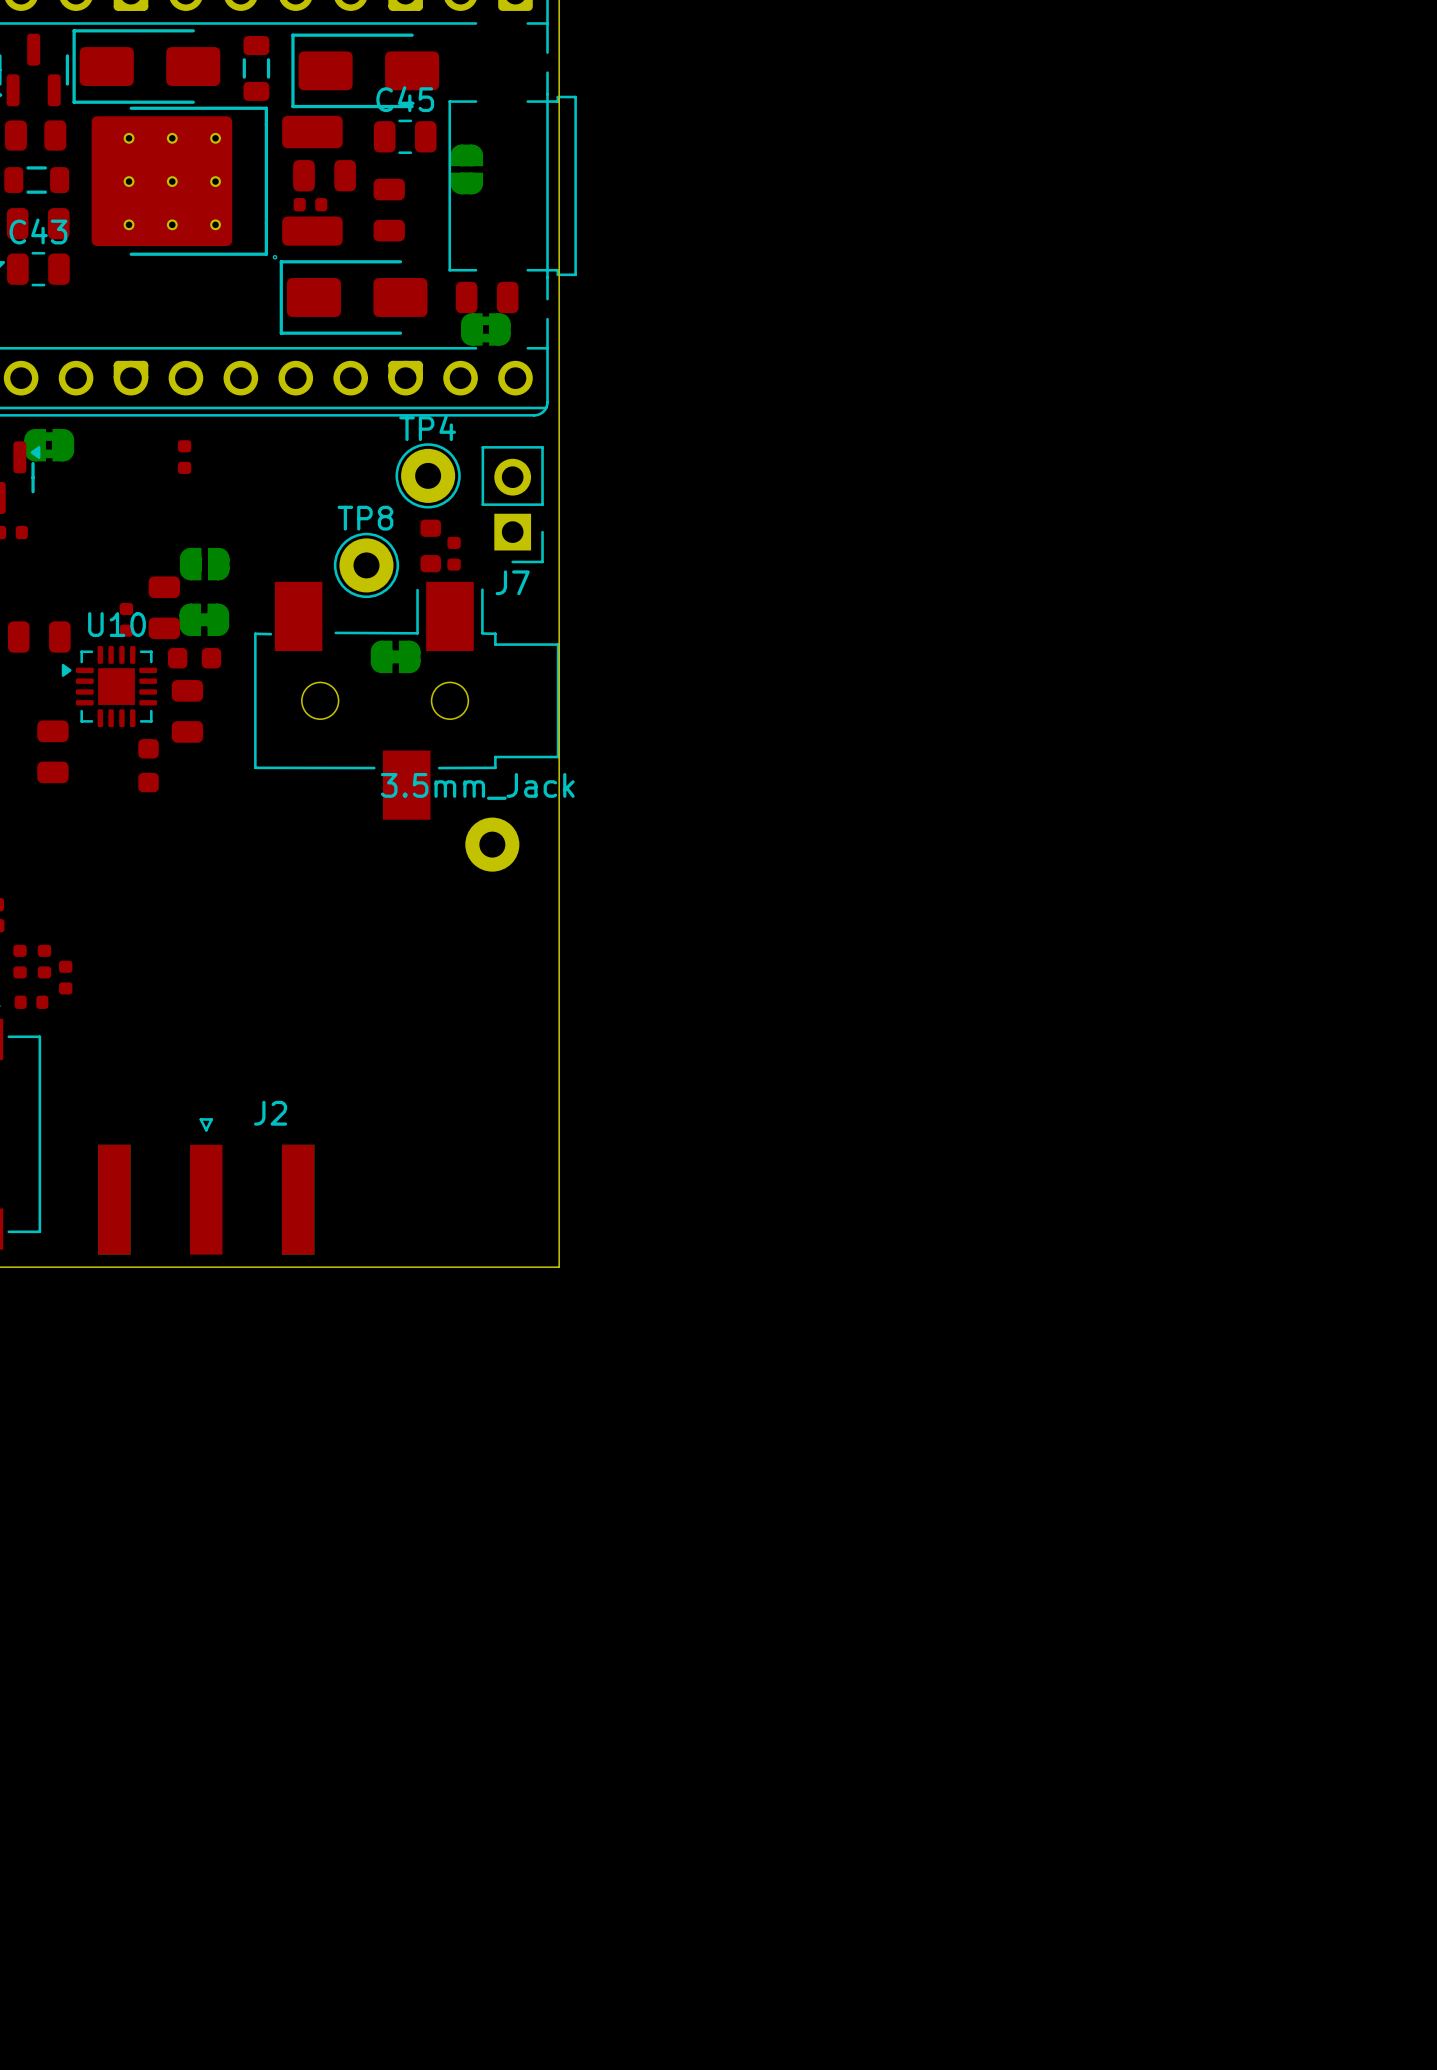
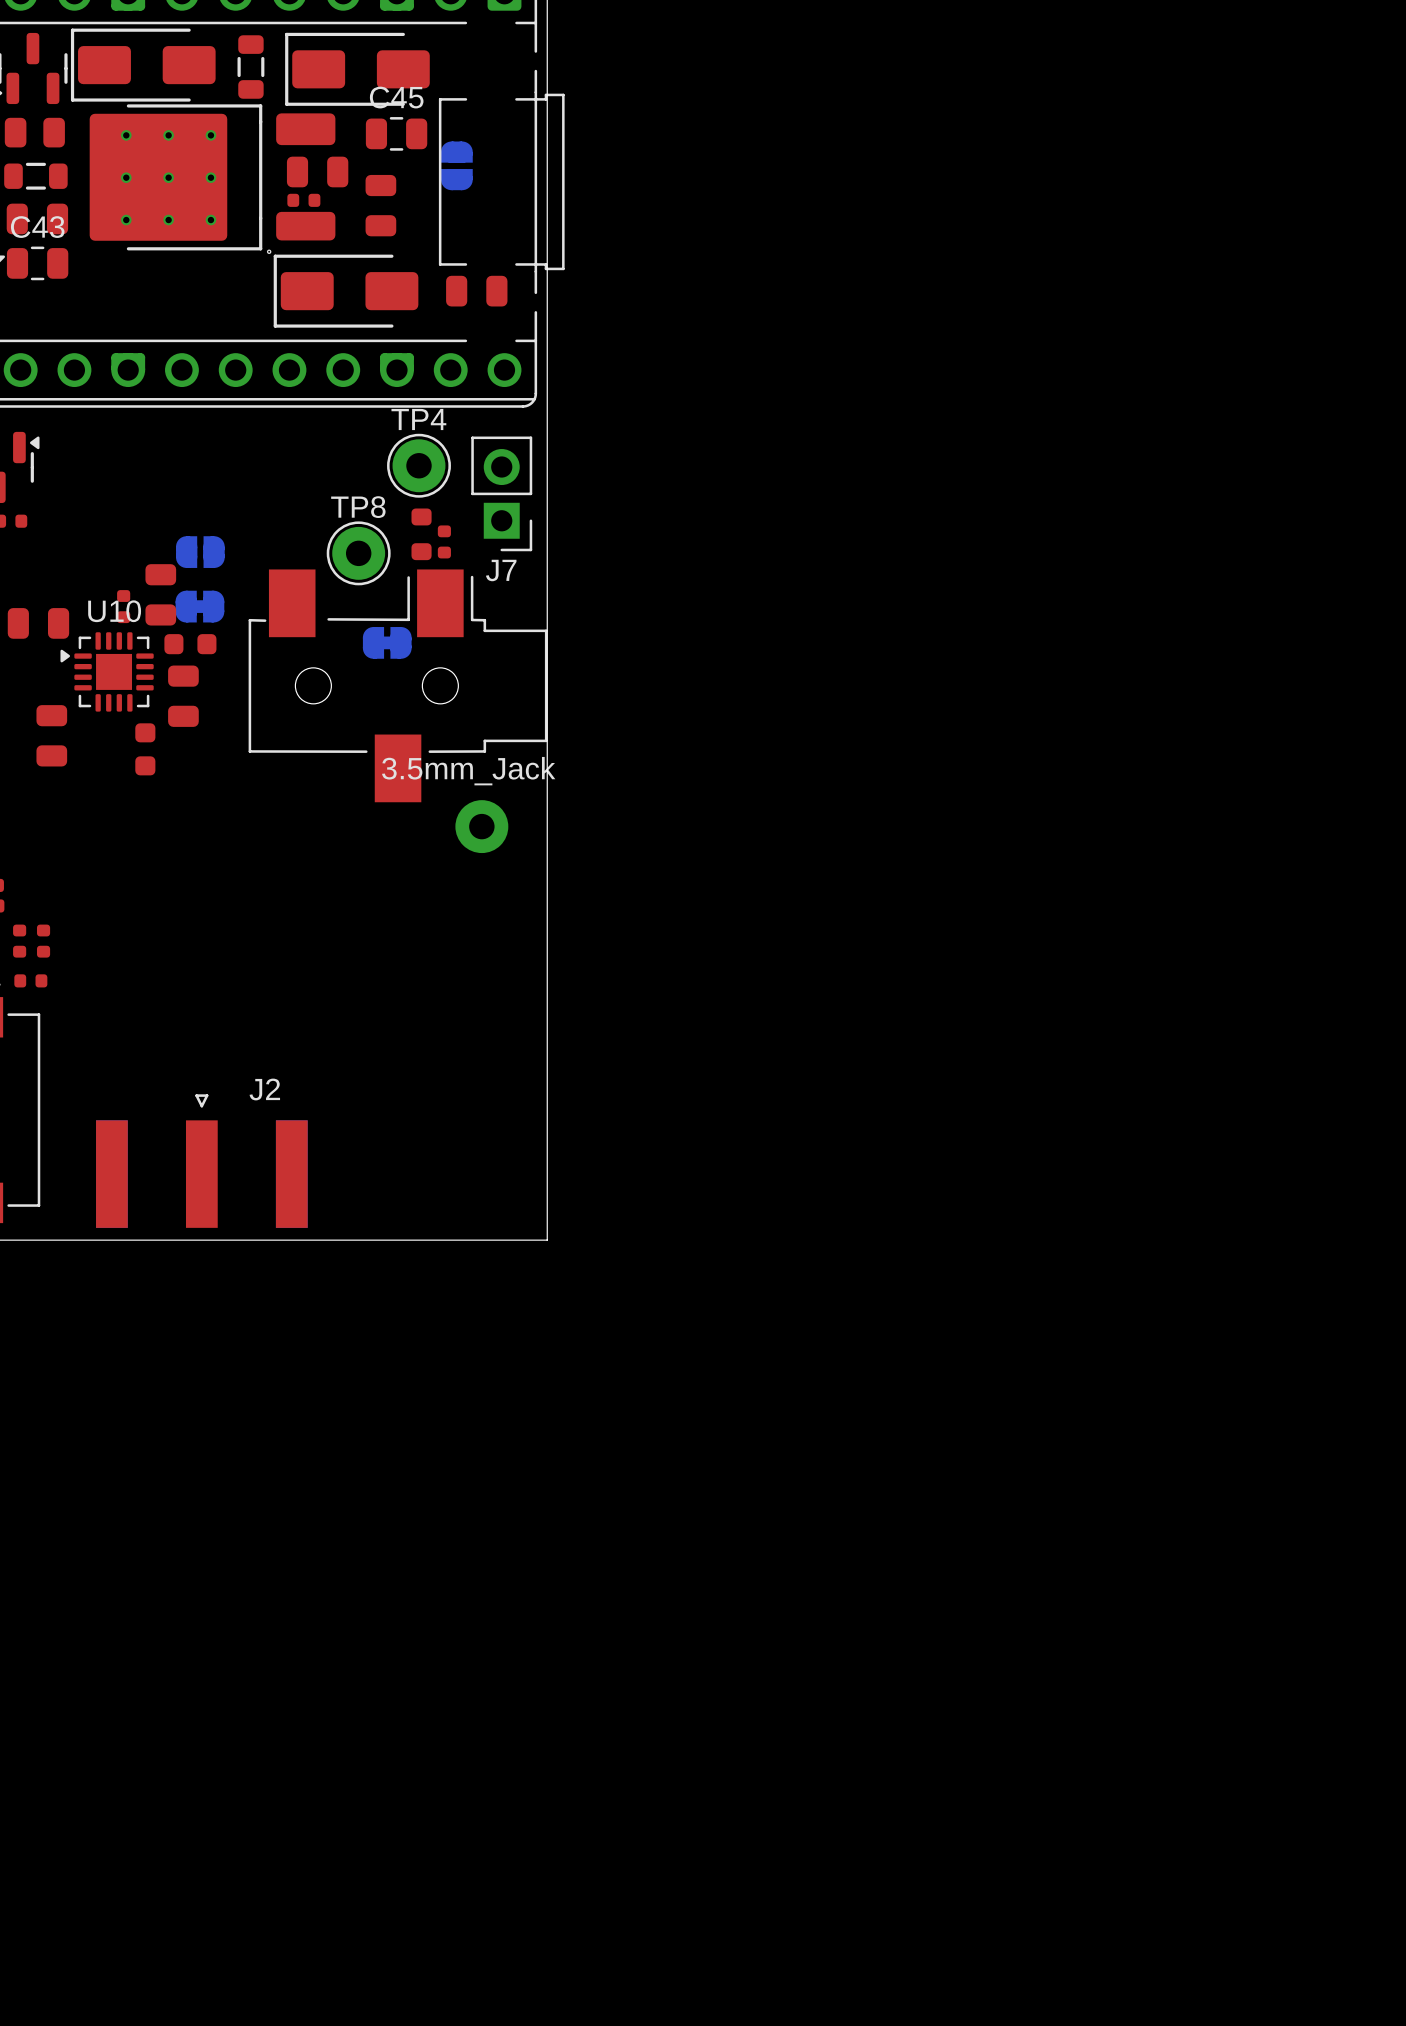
part: (485, 329) -> none
part: (49, 445) -> none
part: (184, 457) -> none
part: (65, 977) -> none

